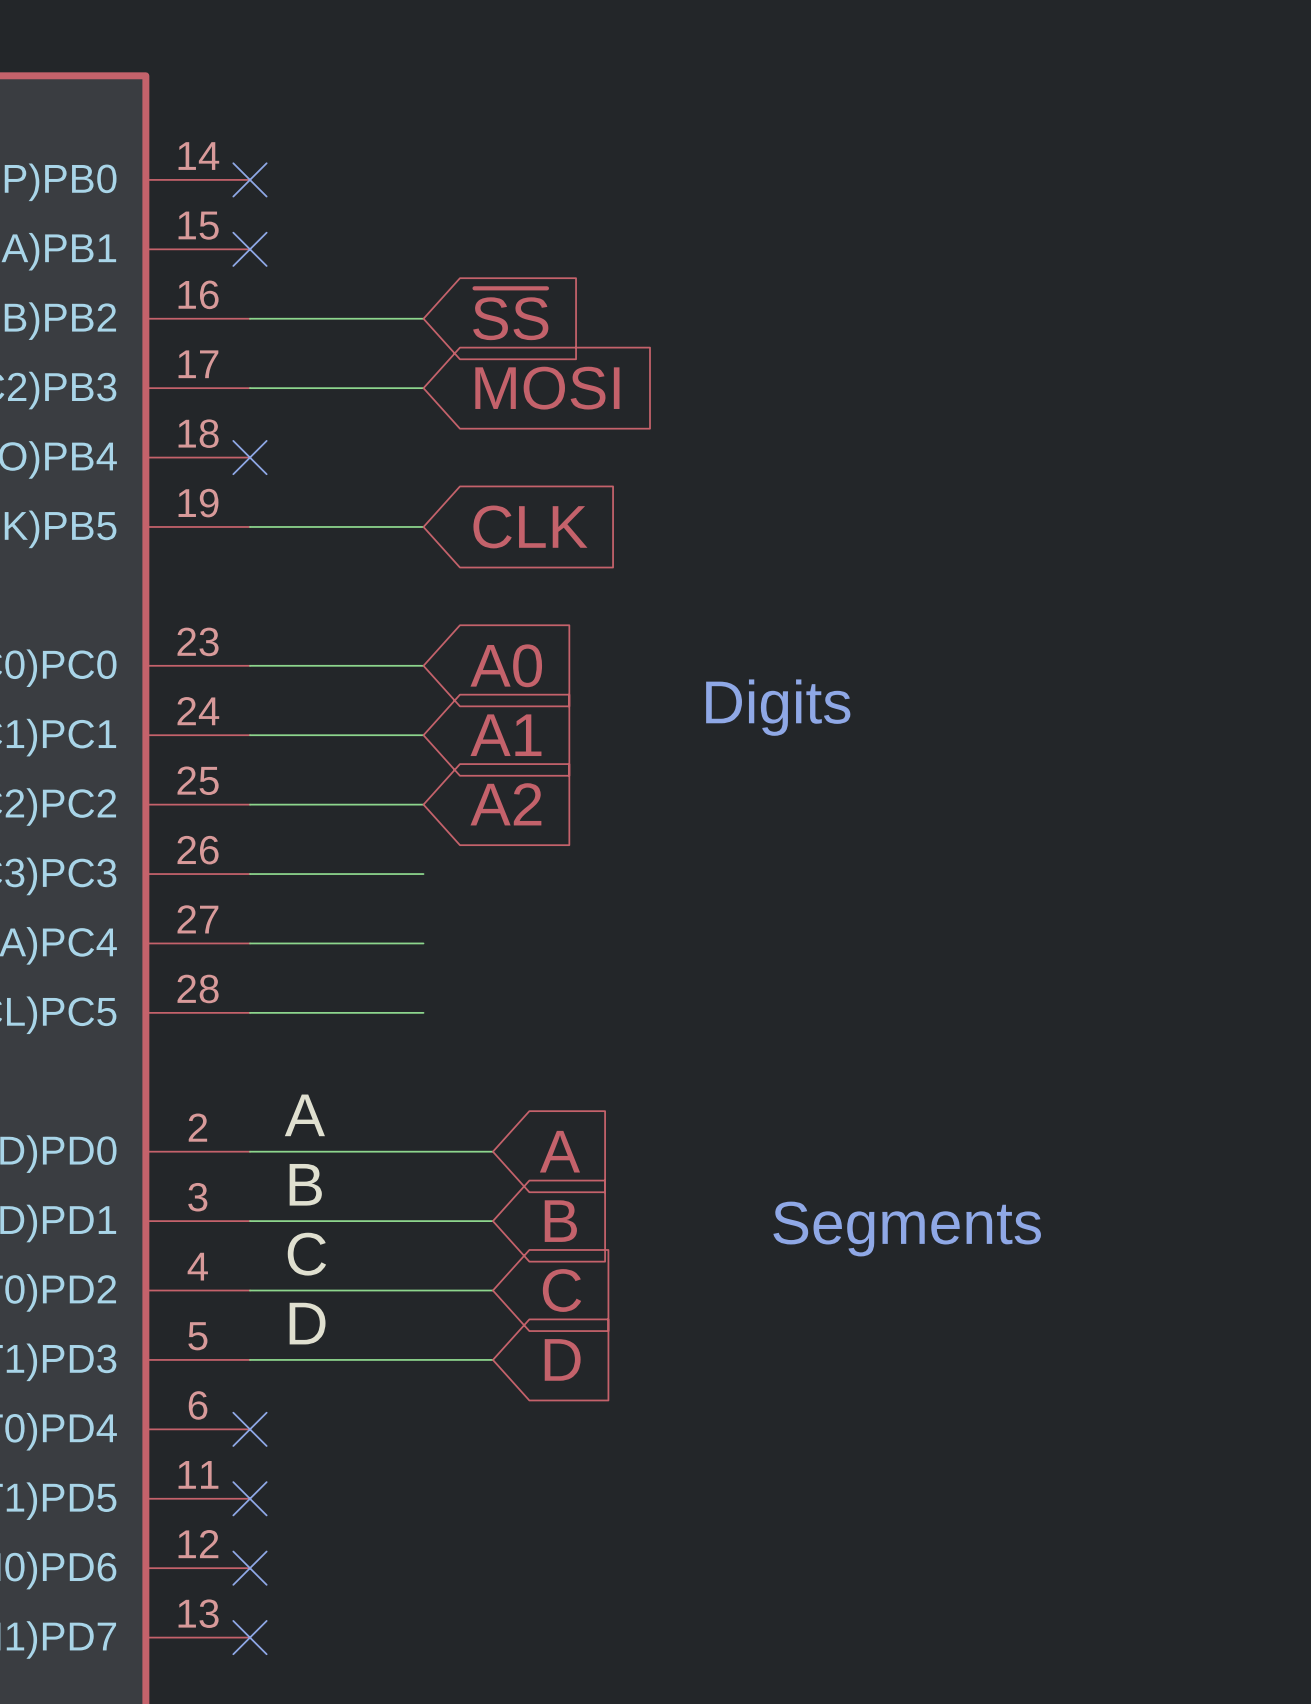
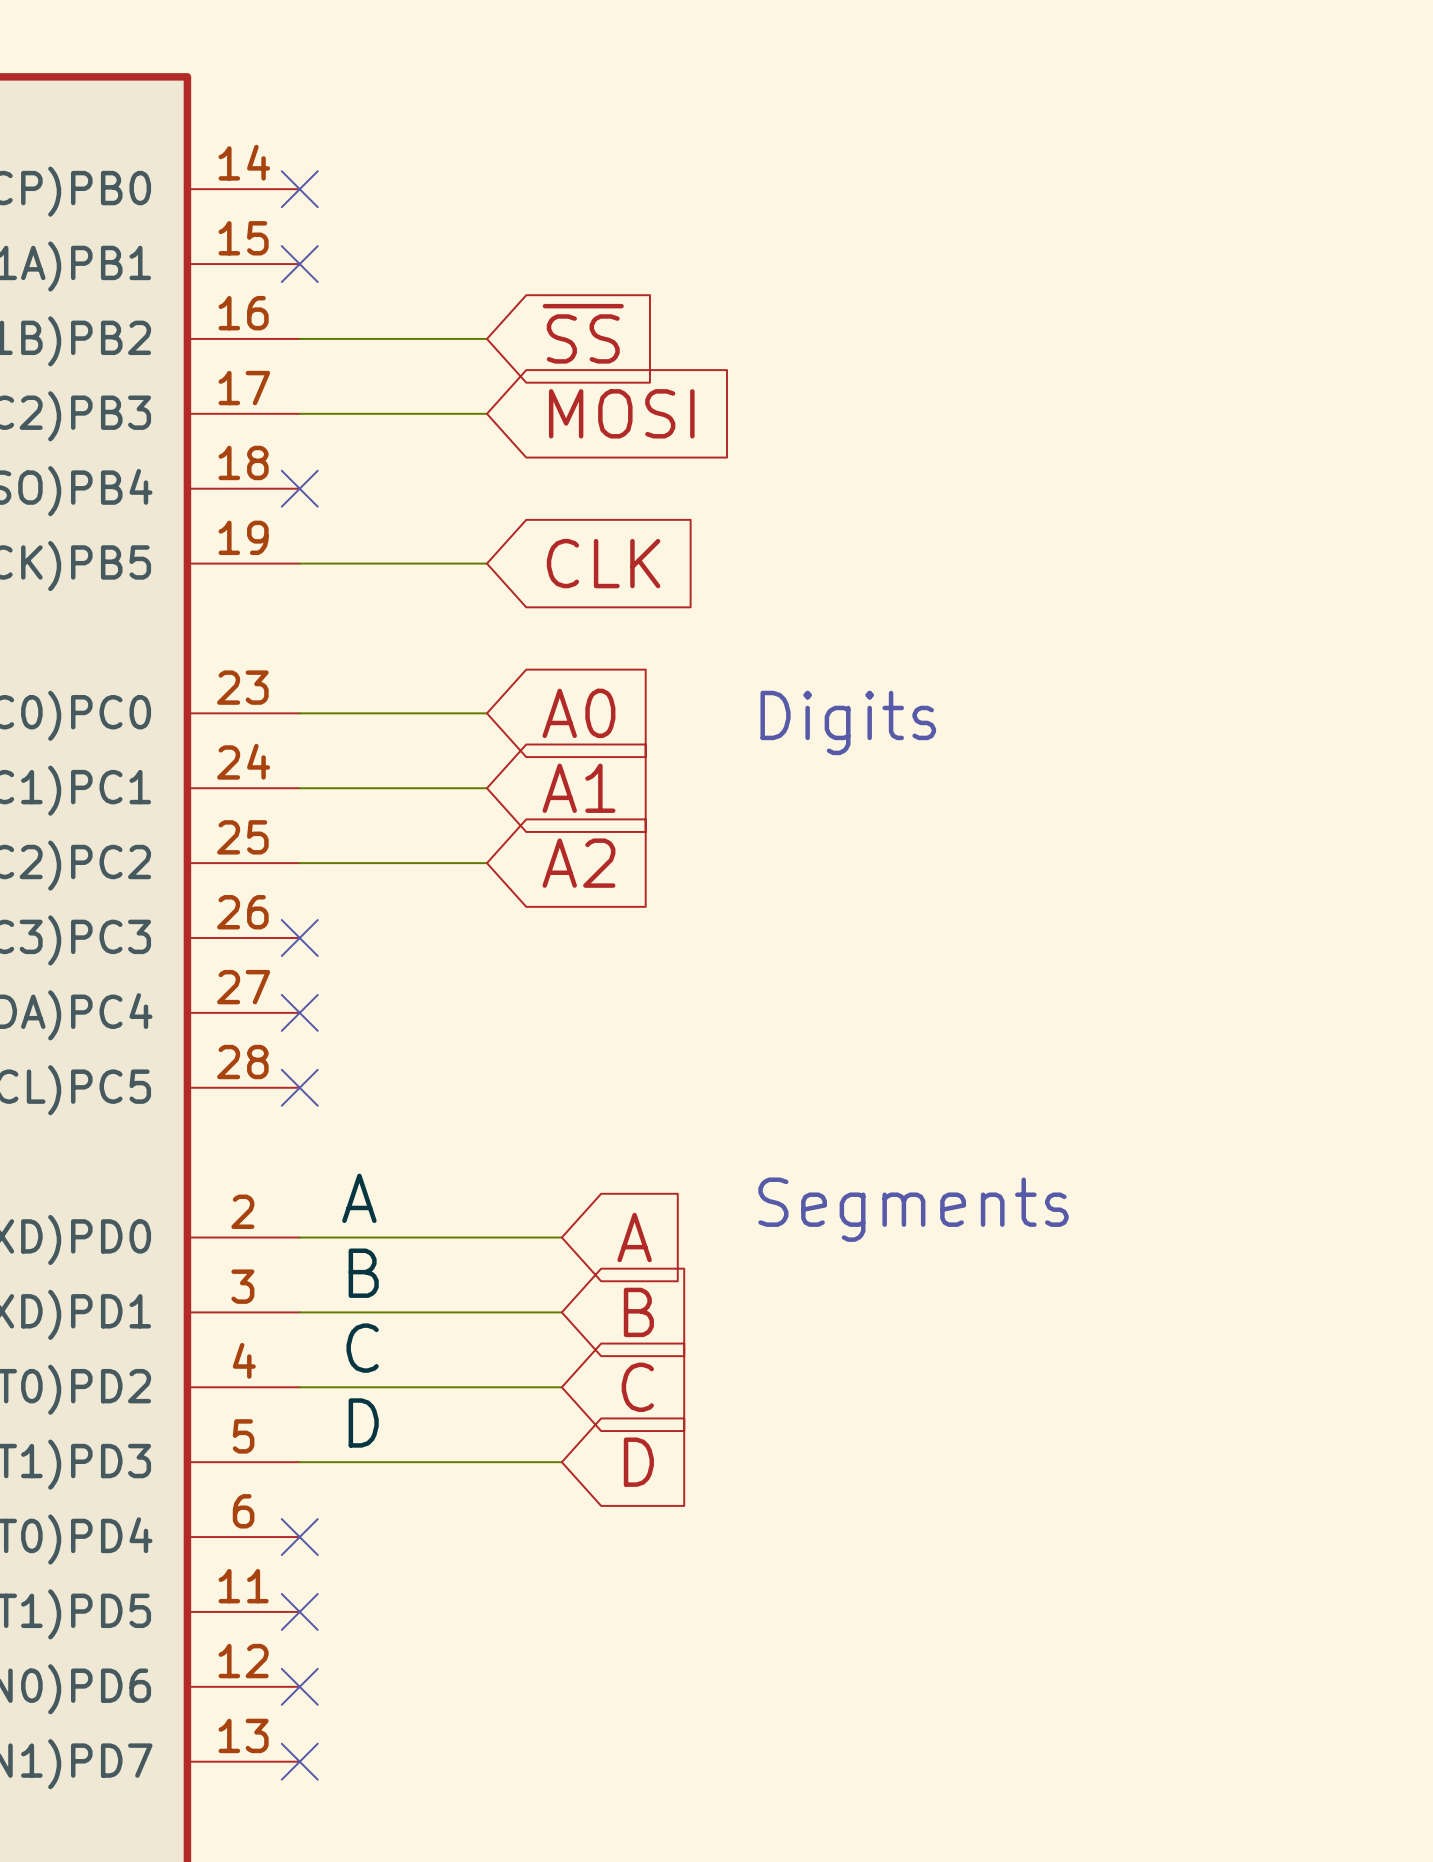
text position: Digits (778, 707) -> Digits (848, 722)
wire: (249, 874) (423, 874) -> none
no-connect mark: none -> (299, 938)
wire: (249, 943) (423, 943) -> none
no-connect mark: none -> (299, 1012)
wire: (249, 1012) (423, 1012) -> none
no-connect mark: none -> (299, 1087)
text position: Segments (907, 1229) -> Segments (913, 1209)

